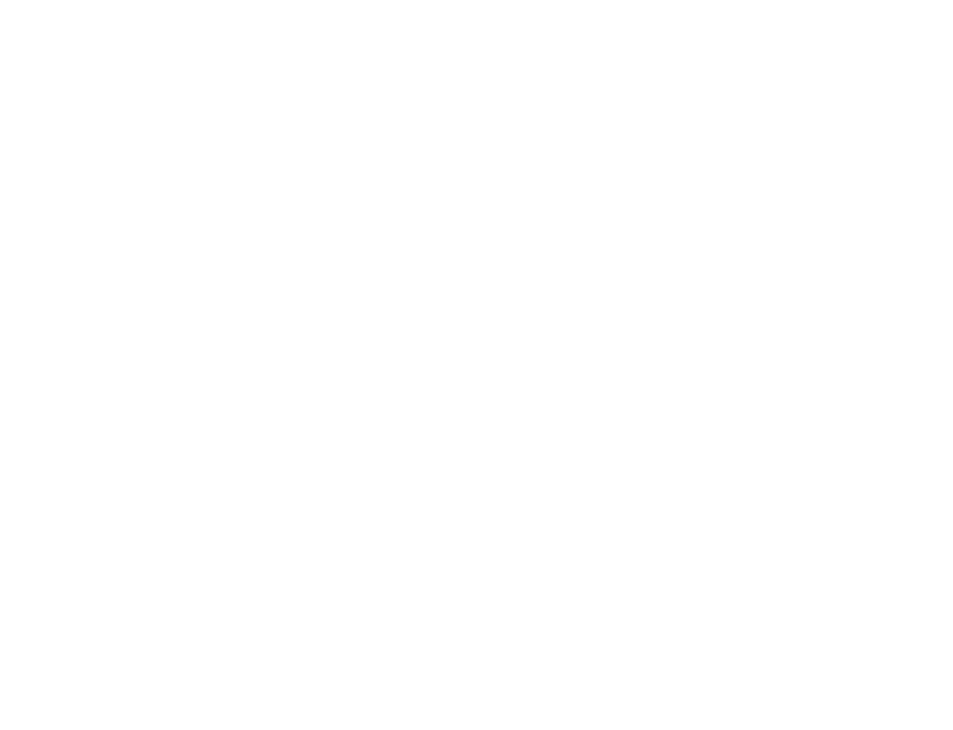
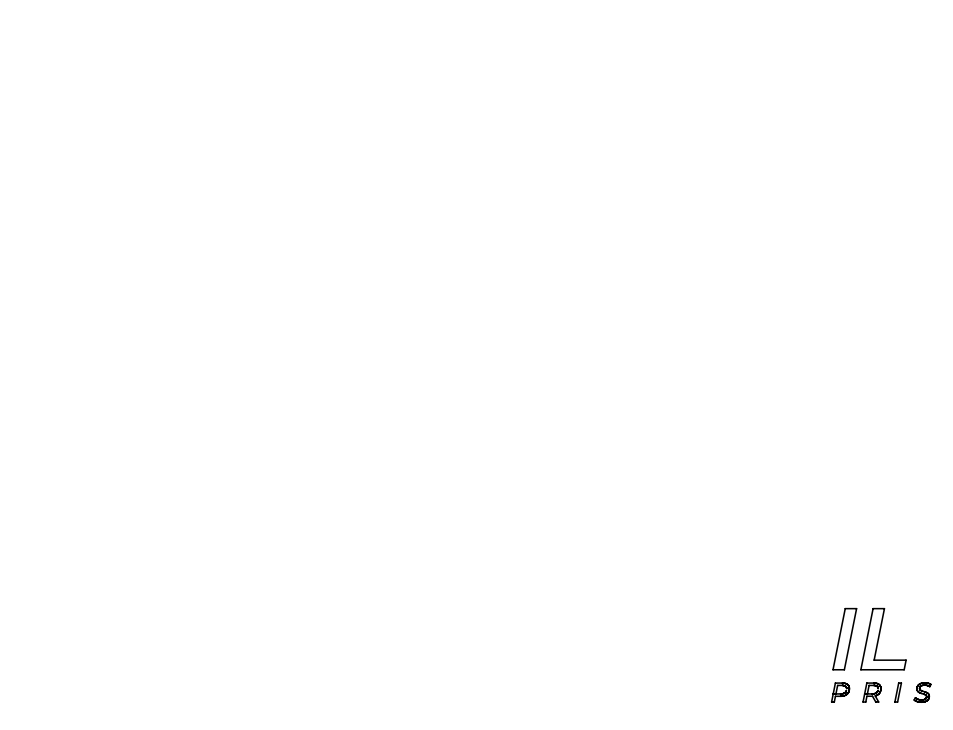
line: none -> (845, 608) (856, 608) (844, 669) (833, 669) (845, 608)
line: none -> (873, 608) (884, 608) (874, 660) (906, 660) (904, 669) (860, 669) (873, 608)
line: none -> (898, 683) (901, 683) (897, 702) (894, 702) (898, 683)
line: none -> (842, 685) (837, 685) (835, 693)
line: none -> (873, 685) (869, 685) (867, 693)
line: none -> (920, 686) (929, 686) (930, 684) (922, 683) (917, 686) (918, 691) (926, 696)
line: none -> (919, 688) (928, 693) (928, 698) (922, 702) (914, 699) (915, 697) (920, 699) (925, 698)
line: none -> (833, 693) (831, 702) (834, 702) (835, 696) (847, 694) (848, 686) (844, 683) (835, 683) (833, 693)
line: none -> (843, 693) (833, 693)
line: none -> (864, 693) (863, 702) (865, 702) (866, 696) (872, 696) (875, 702) (878, 702) (875, 695) (880, 692) (880, 686) (876, 683) (866, 683) (864, 693)
line: none -> (875, 693) (864, 693)

